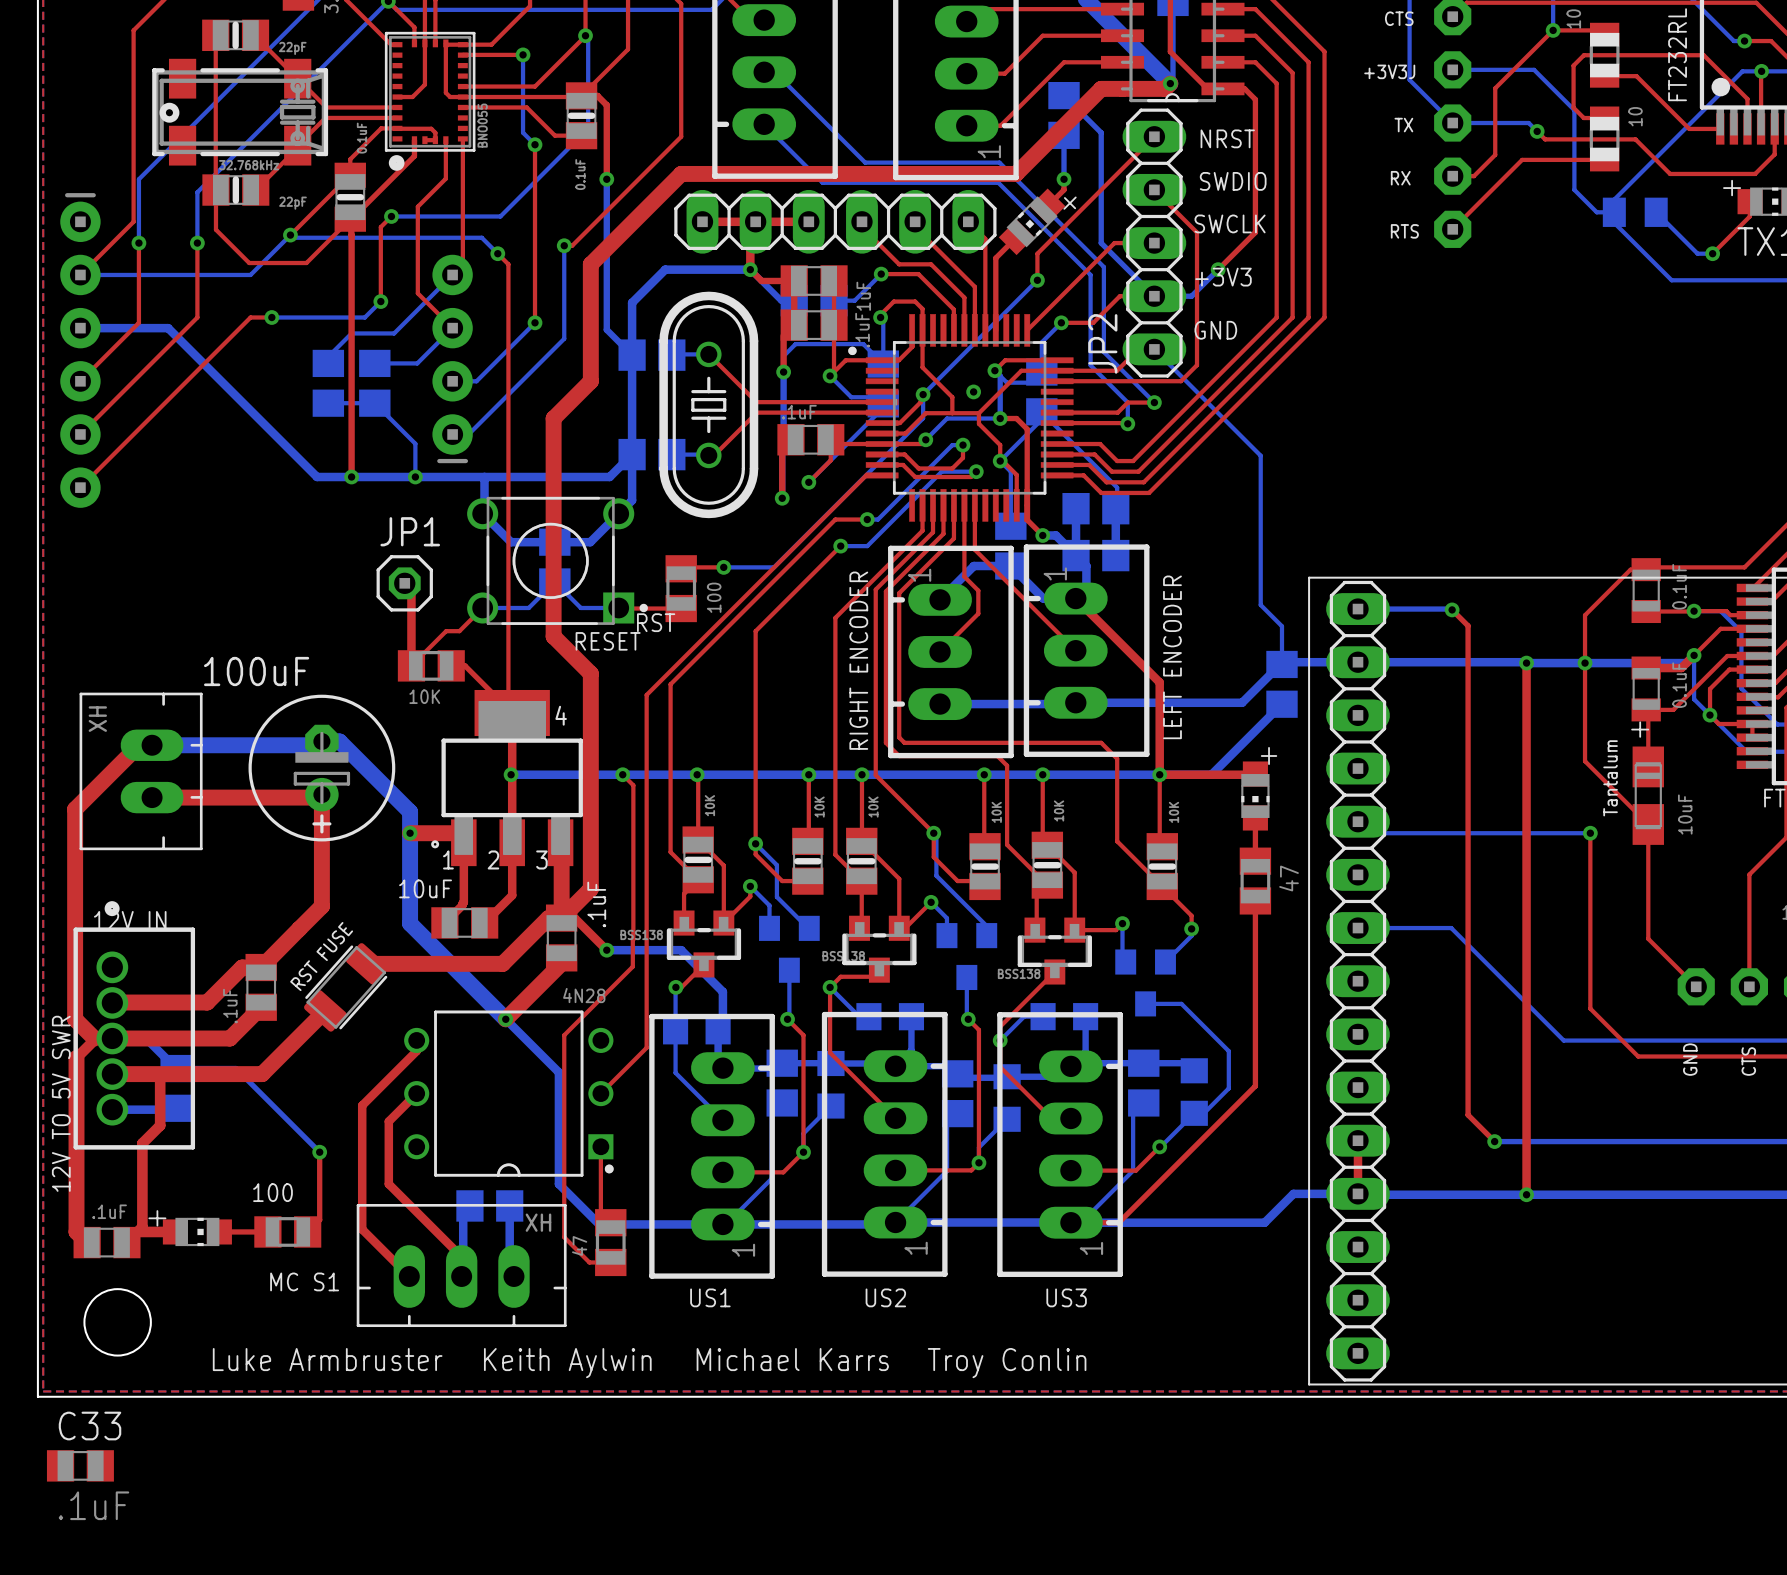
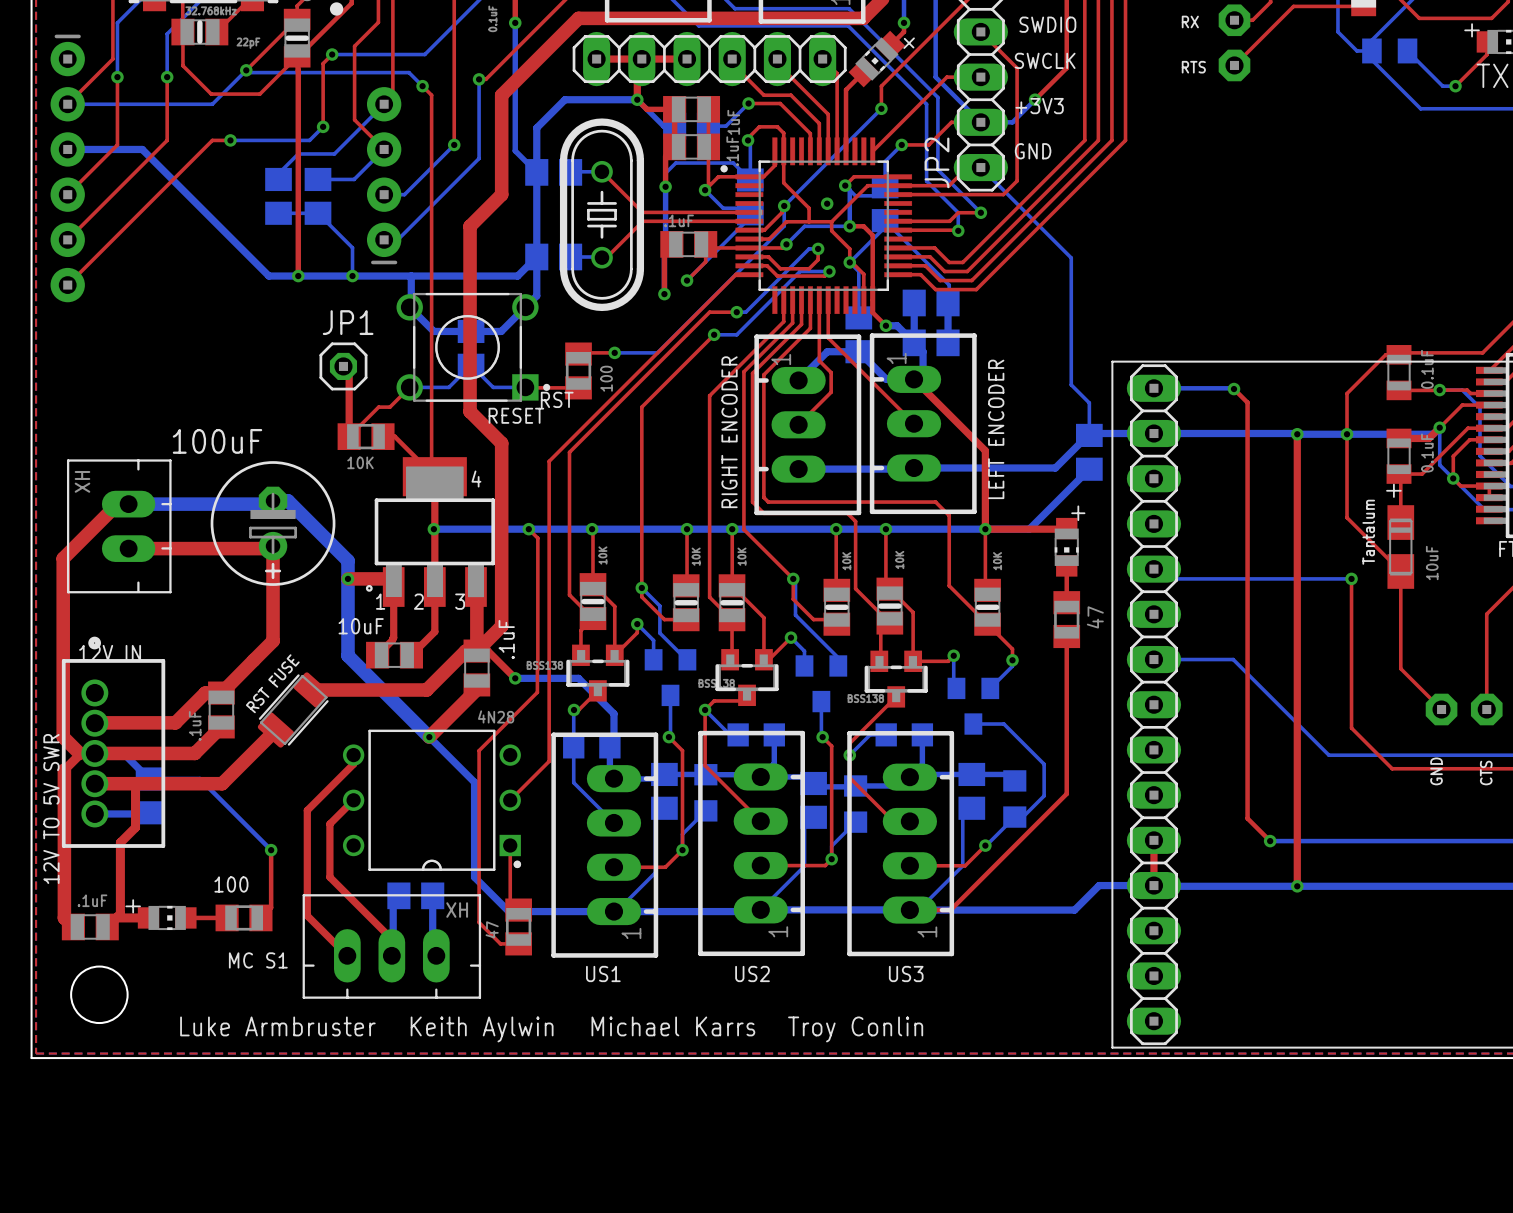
C33: .1uF (80, 1465) -> none

